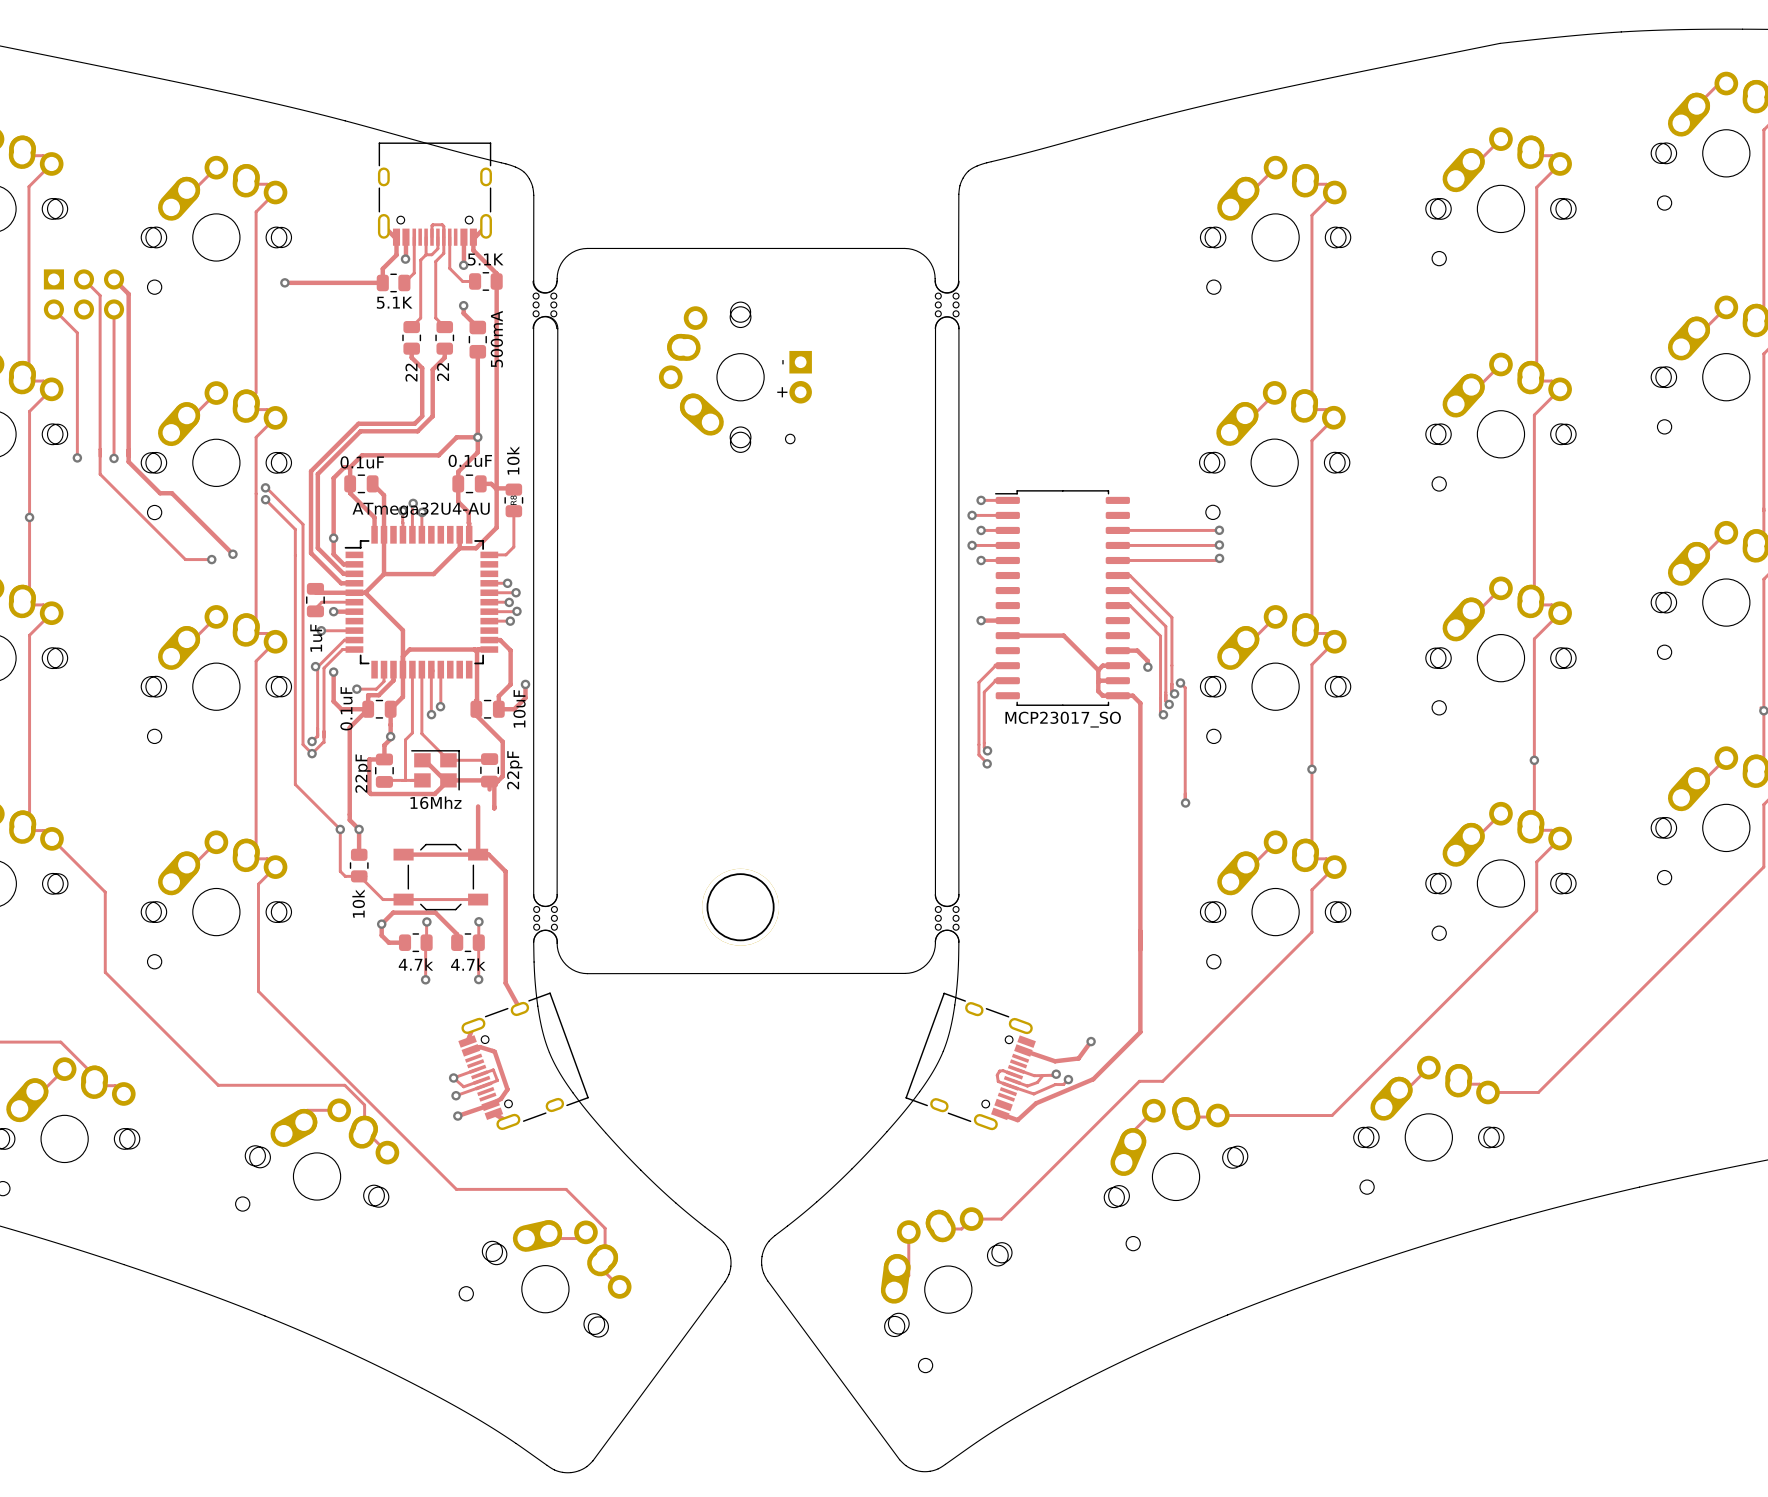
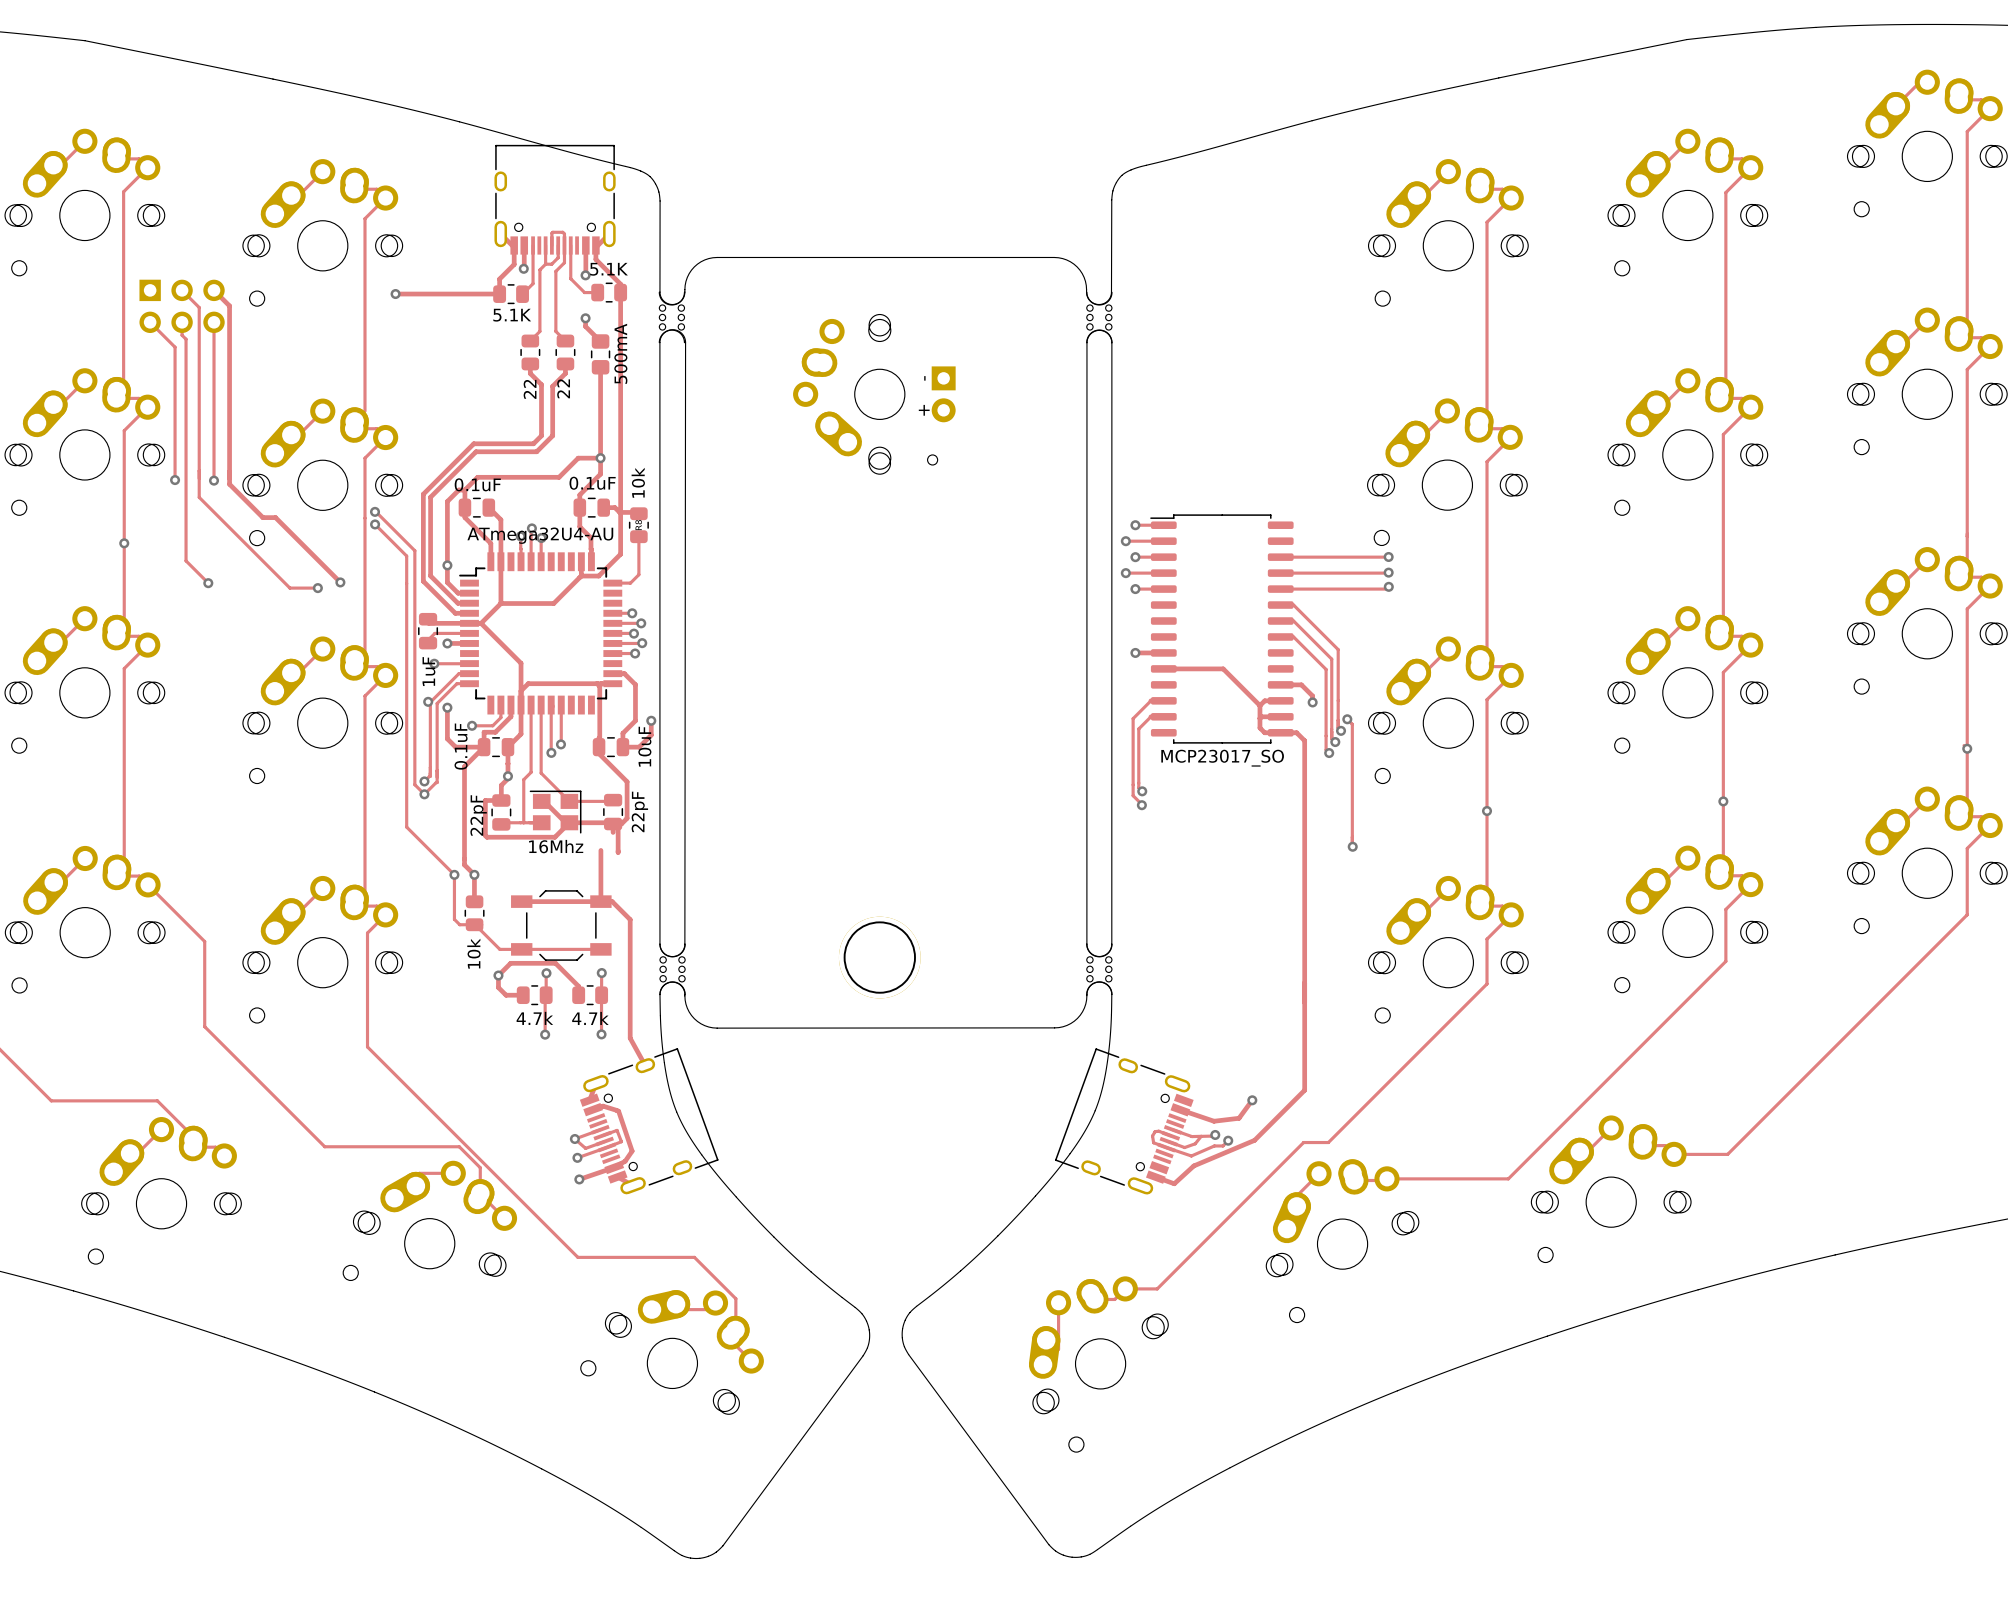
track: none -> (182, 322) (182, 335) (186, 339) (186, 560) (208, 583)
via: none -> (208, 583)

